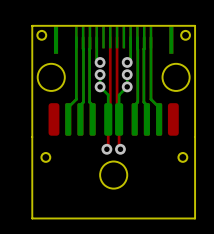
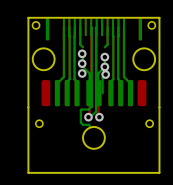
bottom track: none -> (91, 27) (91, 106) (88, 109) (80, 110) (80, 122) (91, 128)
bottom track: none -> (96, 27) (96, 111) (90, 116)
via: (100, 62) -> none
via: (127, 62) -> none
via: none -> (82, 53)
via: (100, 74) -> none
via: none -> (82, 63)
bottom track: none -> (105, 64) (105, 74) (102, 77) (102, 93)
via: (100, 86) -> none
via: none -> (82, 73)
via: none -> (105, 74)

